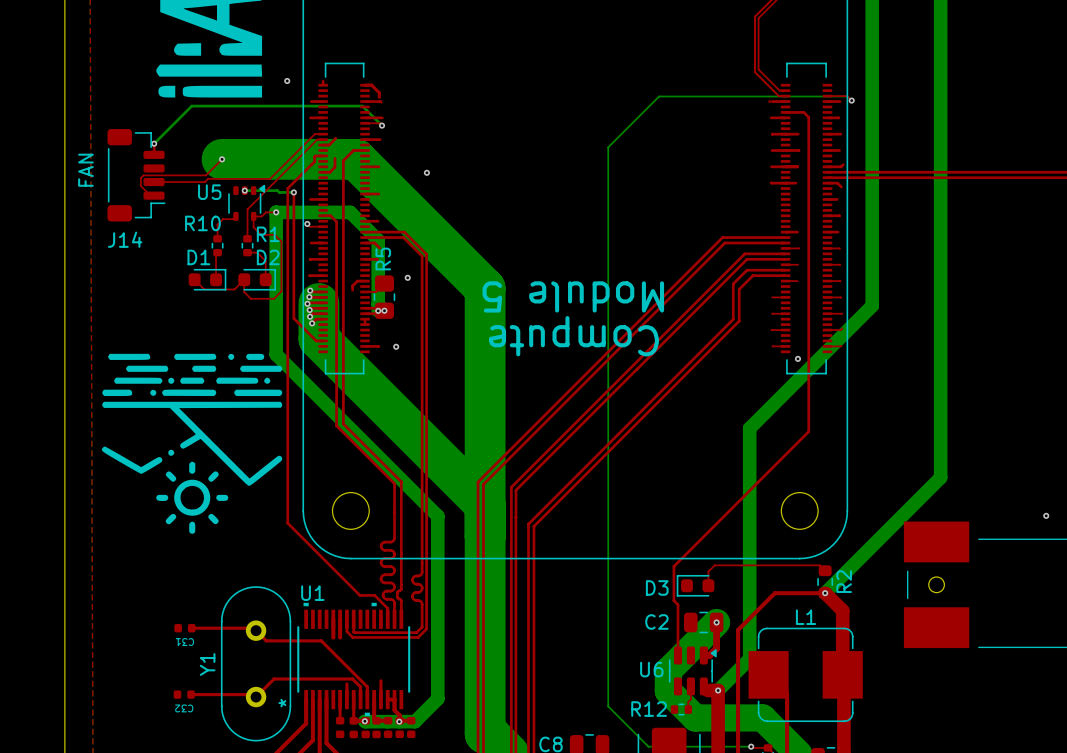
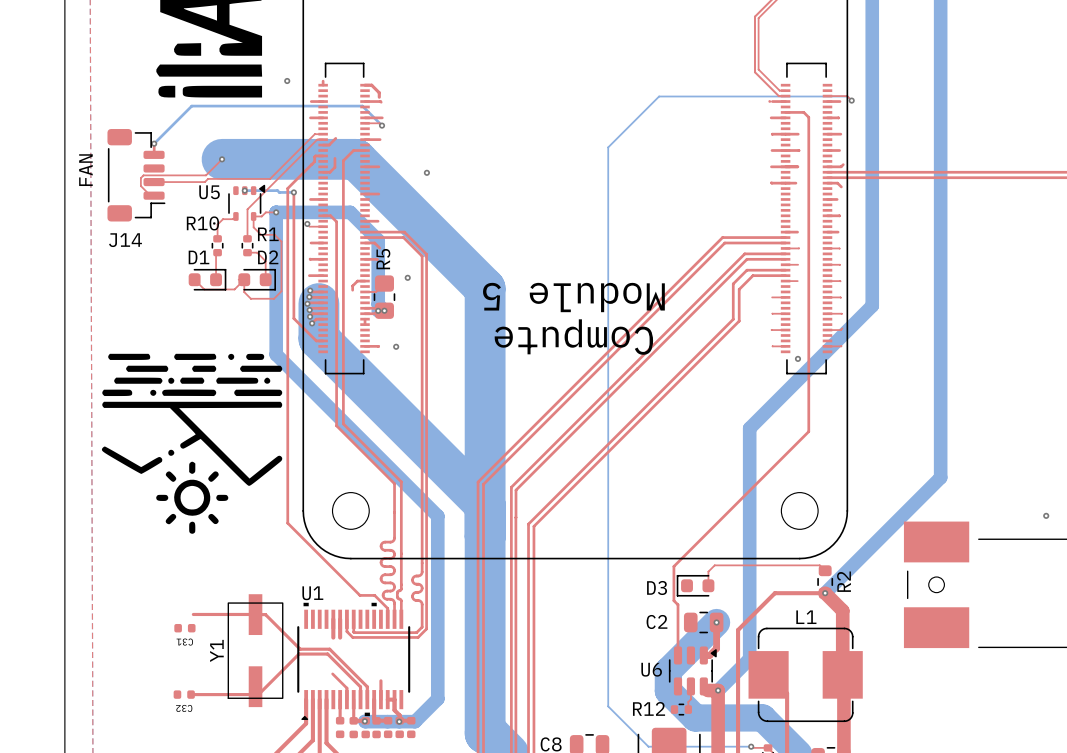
Y1 footprint: [220, 586, 292, 742] -> [227, 594, 284, 708]
U1 footprint: [297, 602, 411, 717] -> [297, 602, 411, 720]
top track: none -> (193, 614) (253, 614)
top track: (191, 628) (253, 628) (266, 640) (321, 640) (329, 649) -> (253, 614) (265, 614) (300, 649) (329, 649)
top track: (274, 679) (352, 679) -> (274, 679) (299, 654) (327, 654) (352, 679)
top track: (346, 683) (346, 688) -> (332, 673) (346, 688)

